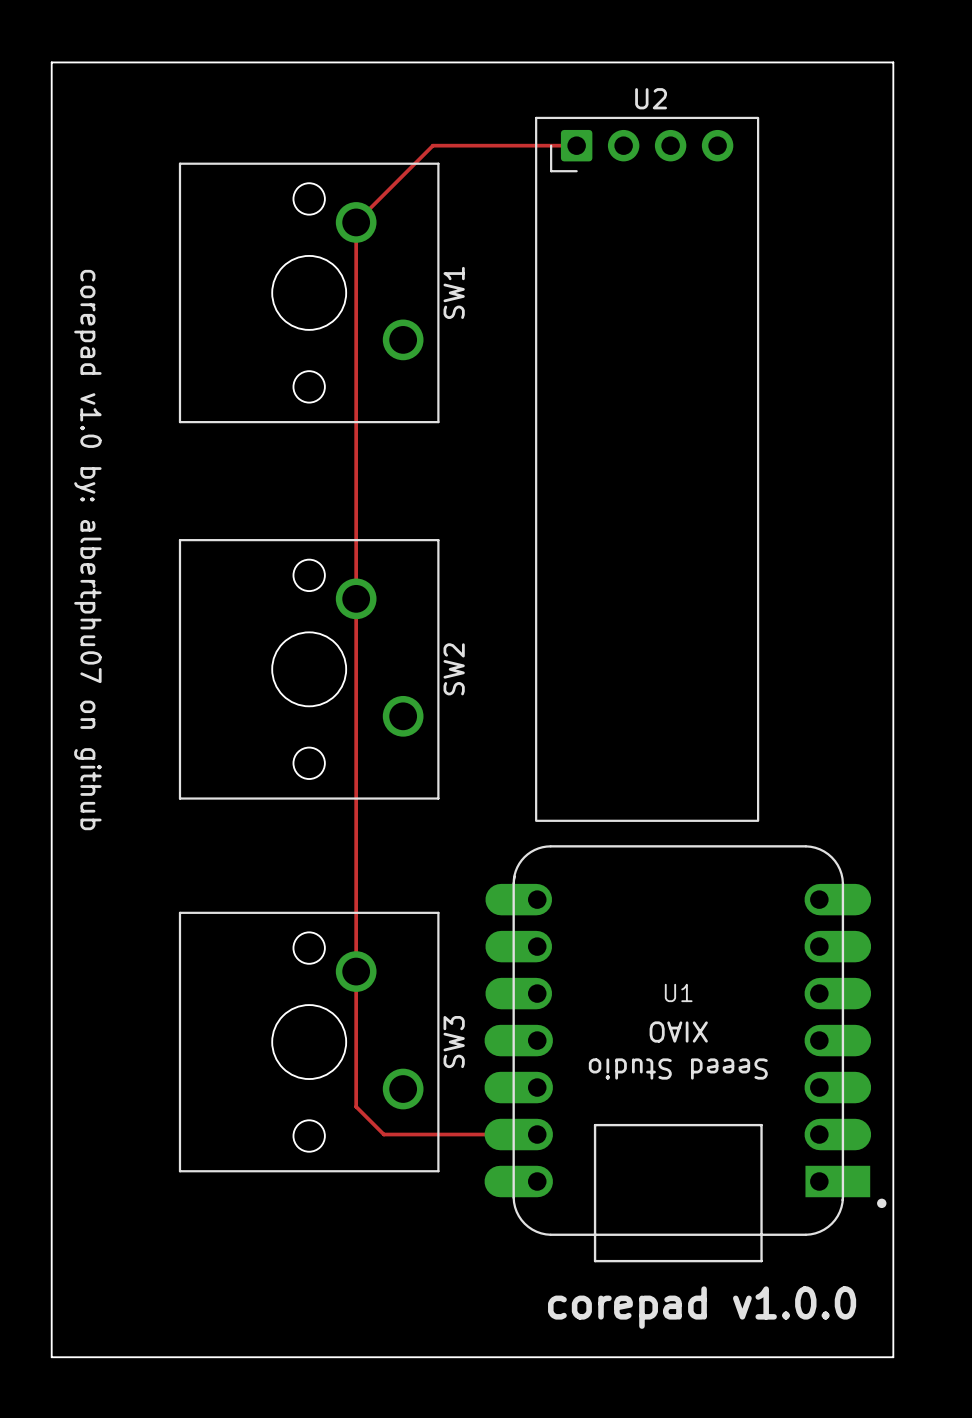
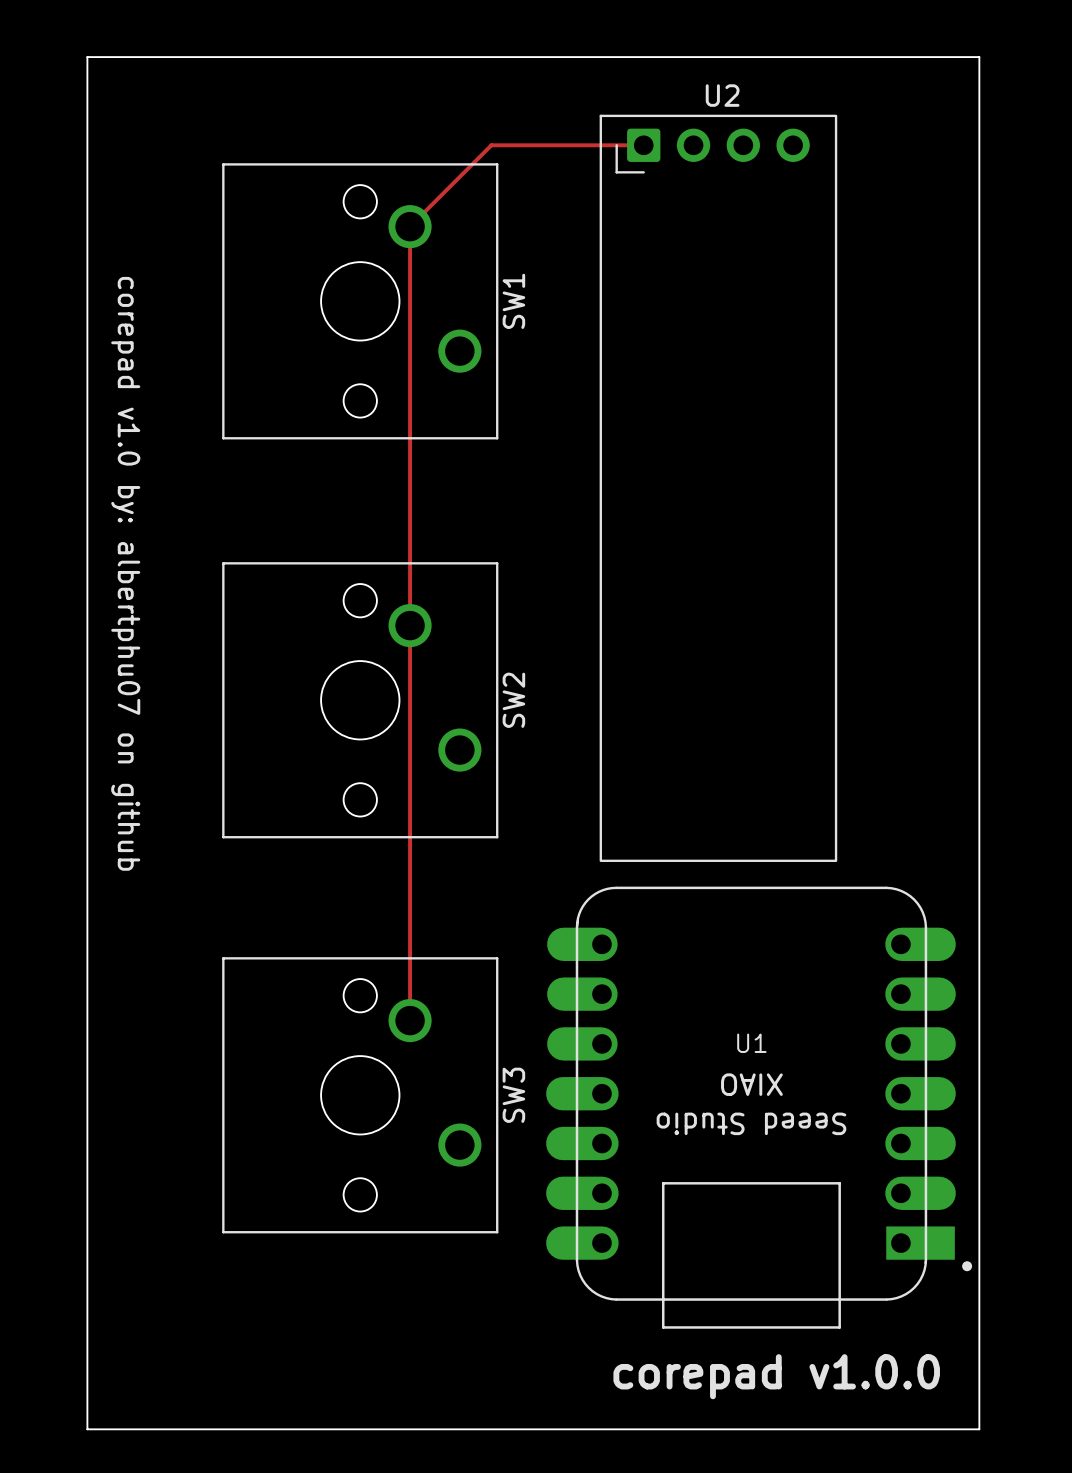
track: (356, 971) (356, 1106) (383, 1134) (537, 1134) -> none

